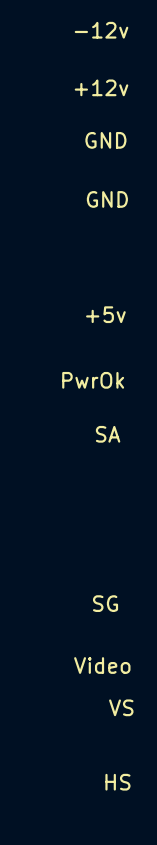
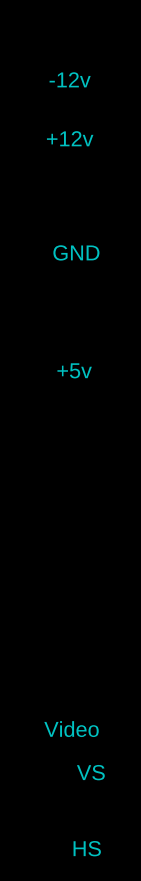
text: GND (105, 140) -> none
text: PwrOk (93, 380) -> none
text: SA (108, 434) -> none
text: SG (105, 603) -> none

